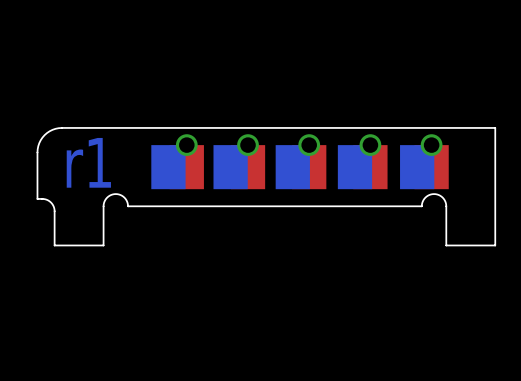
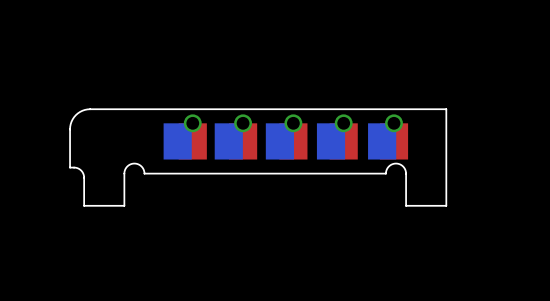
text: r1 (88, 162) -> none

